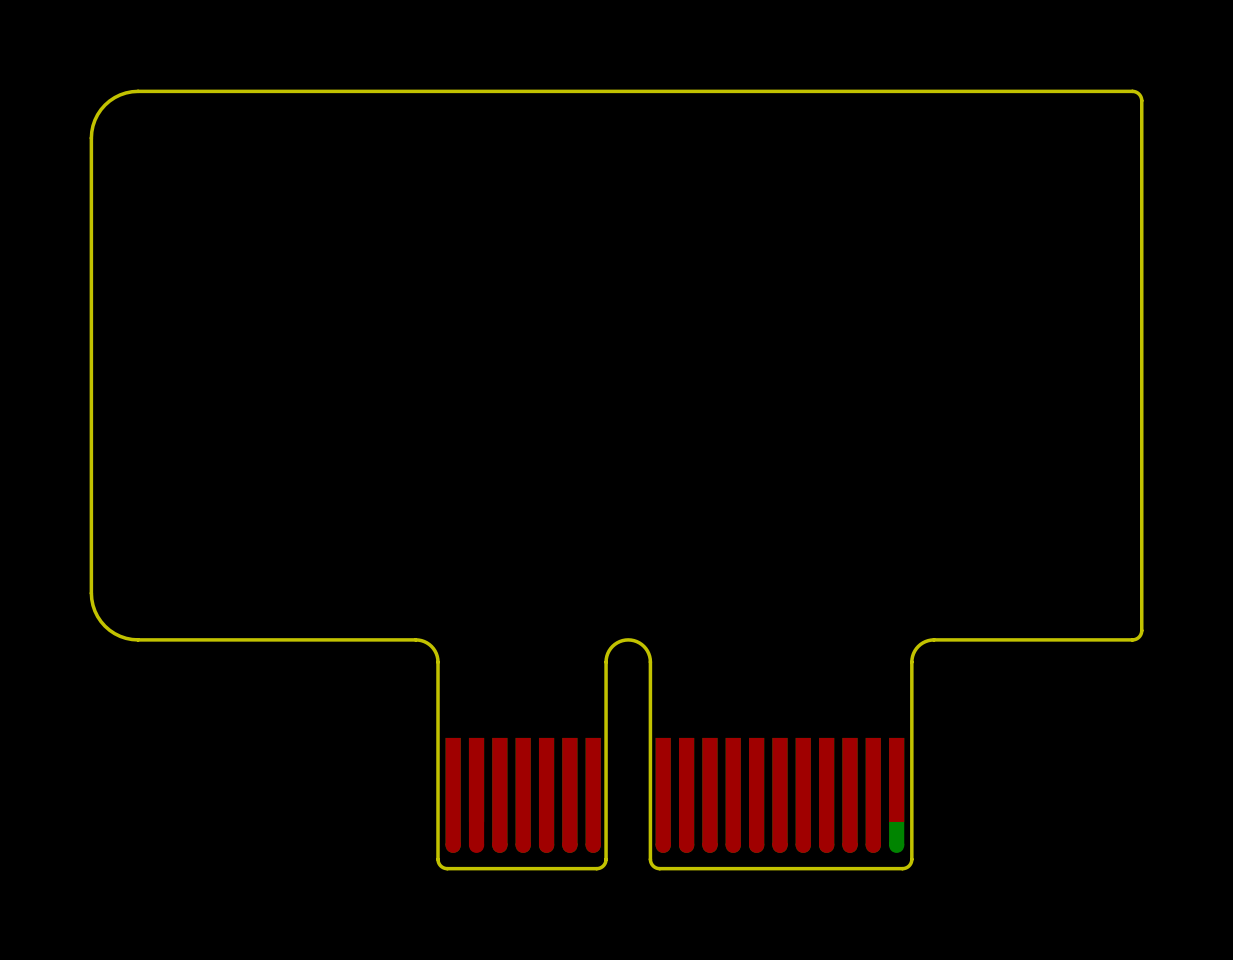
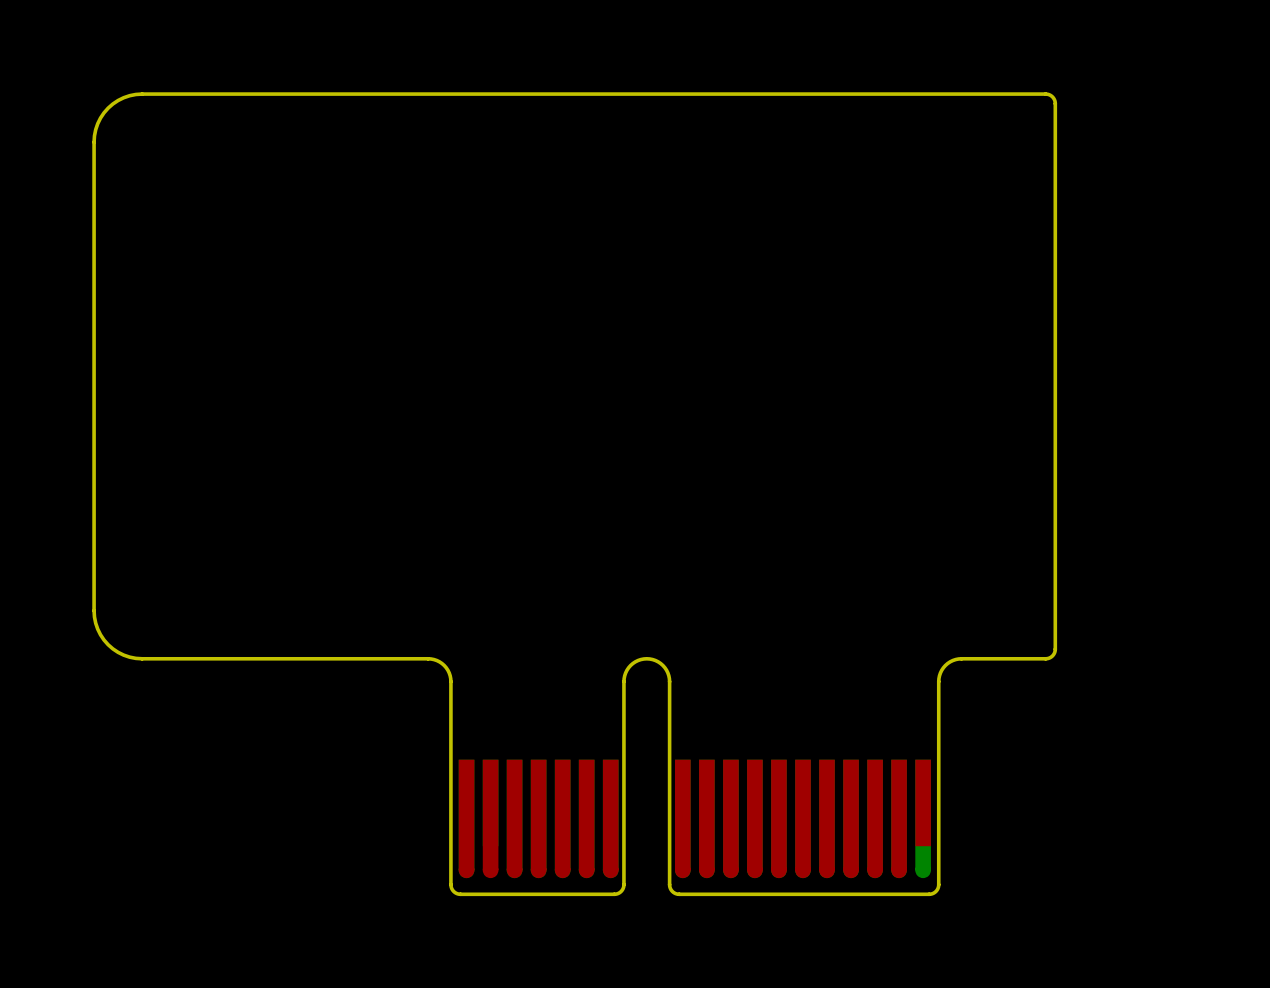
board edge: (1015, 91) (1133, 91) (1139, 94) (1141, 100) (1141, 632) (1138, 637) (1132, 639) (1015, 639) -> (1045, 94) (1052, 96) (1055, 103) (1055, 649) (1052, 655) (1045, 658)

